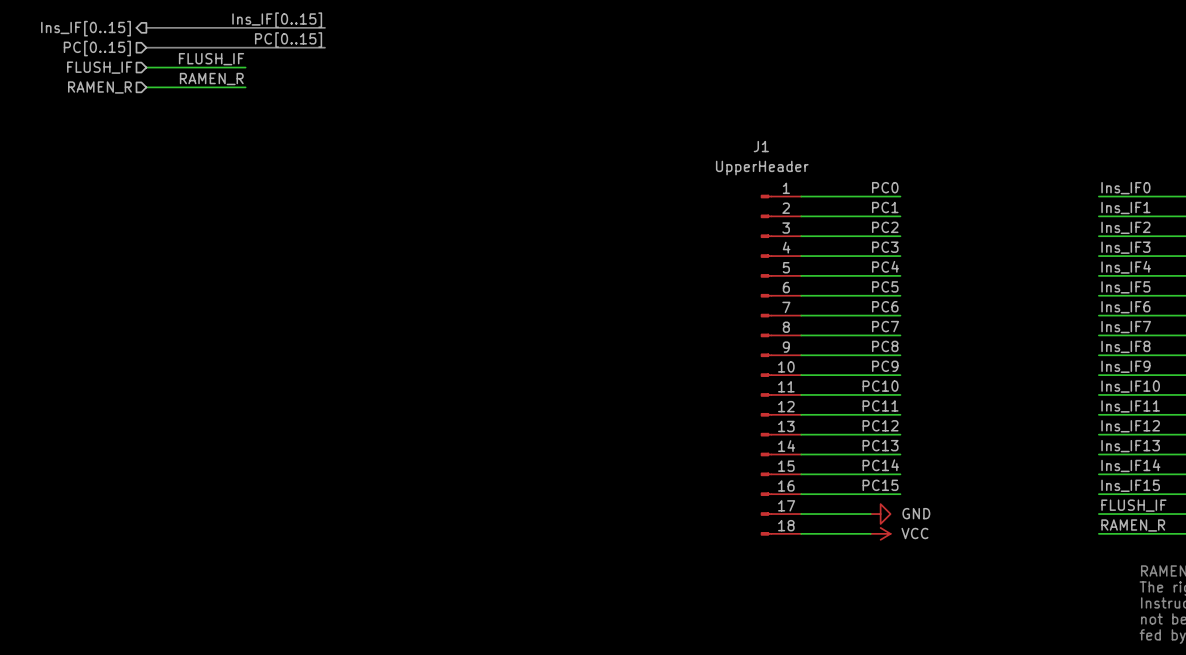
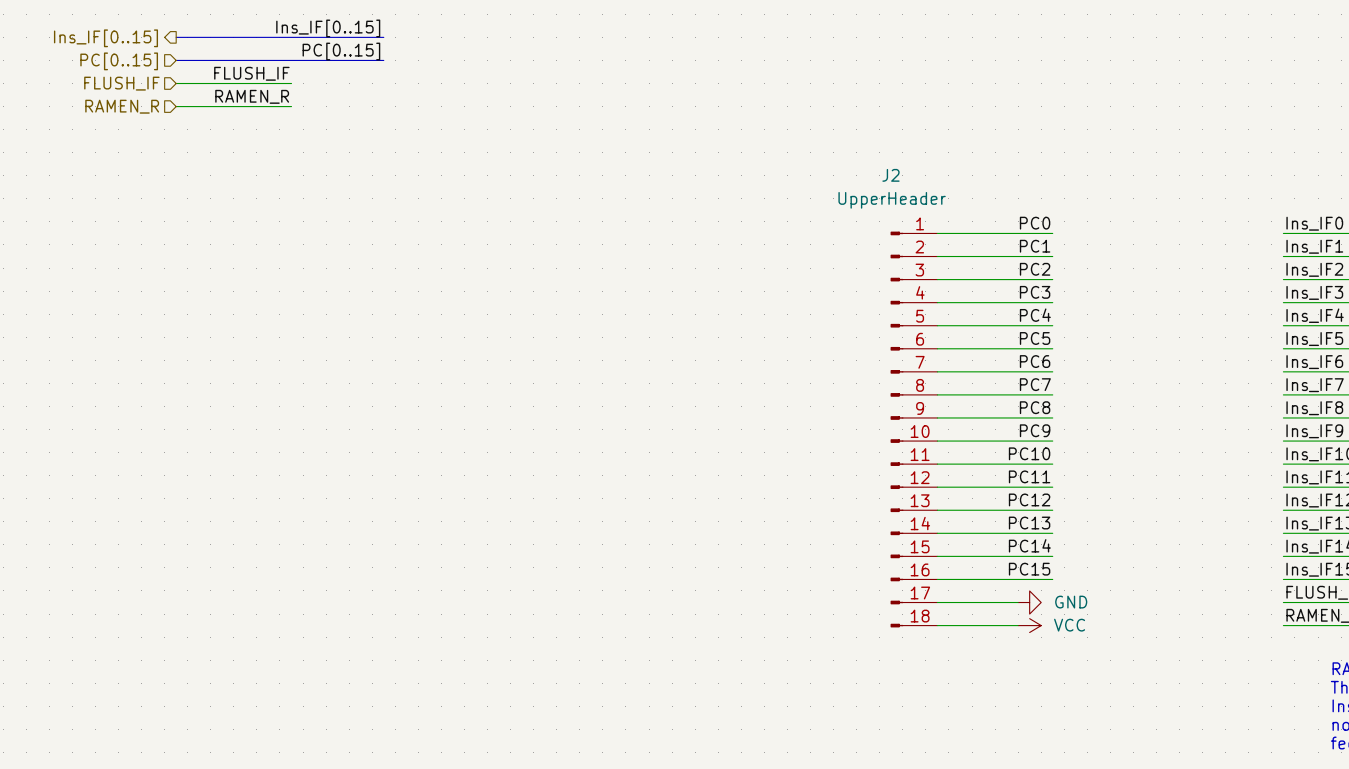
J1 name: J1 (761, 146) -> J2 (890, 175)

